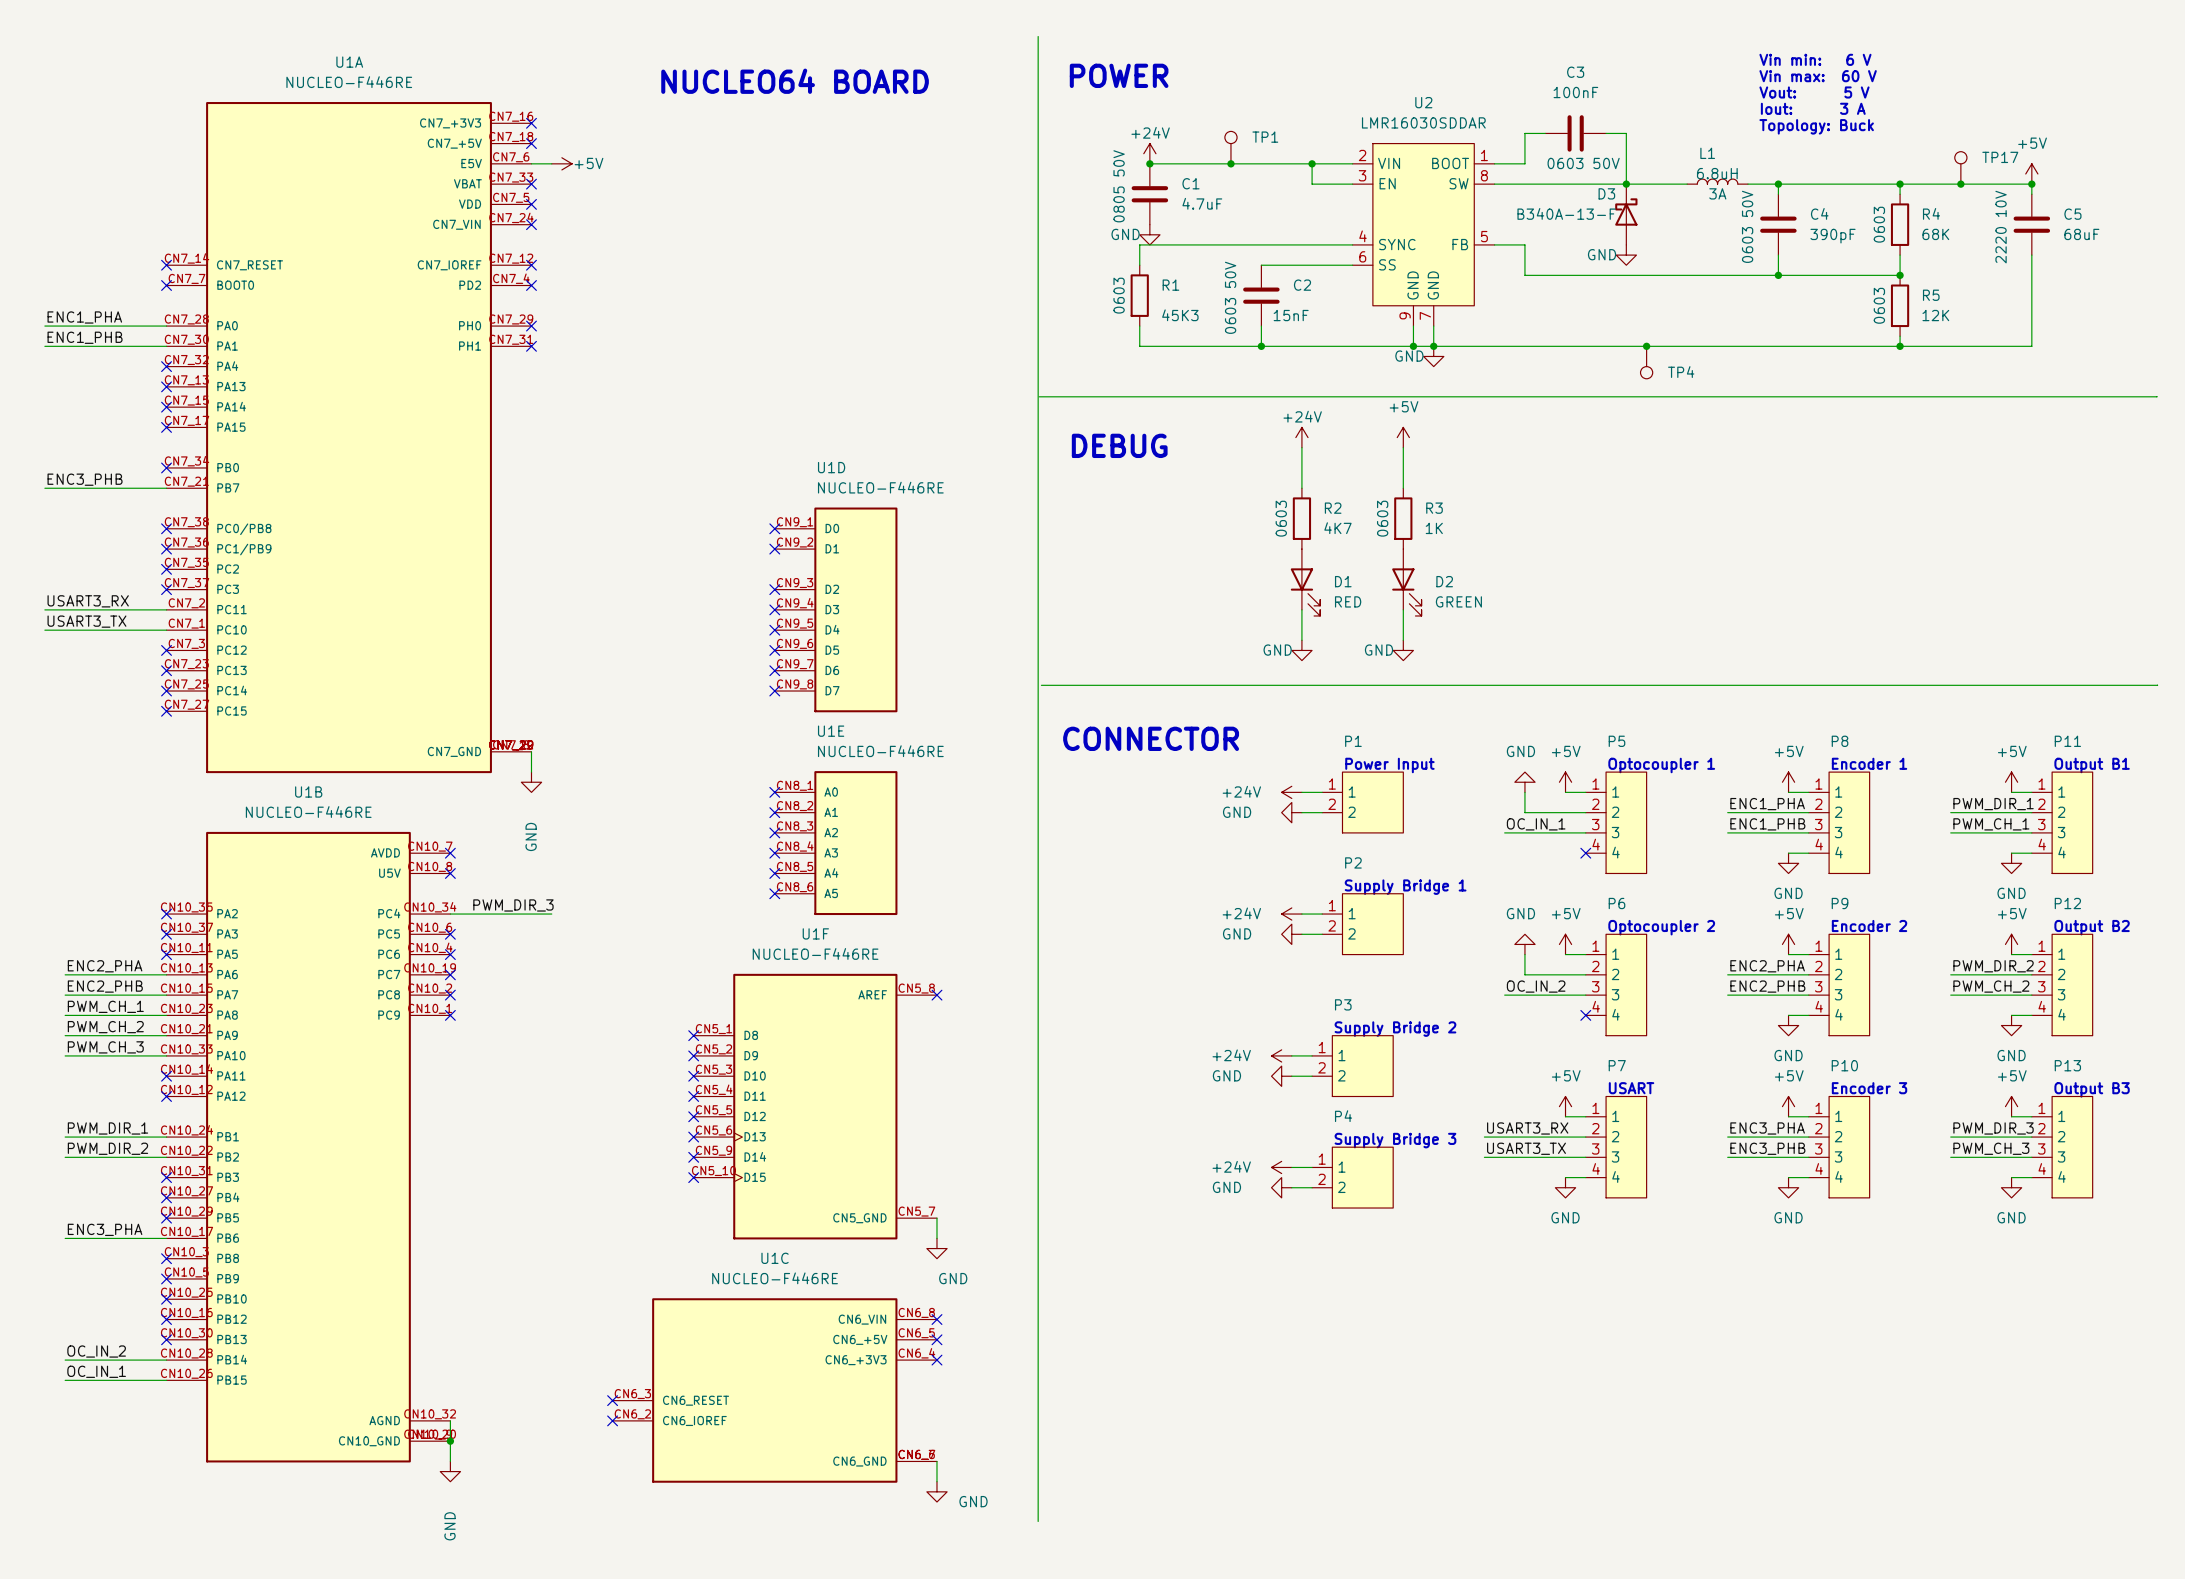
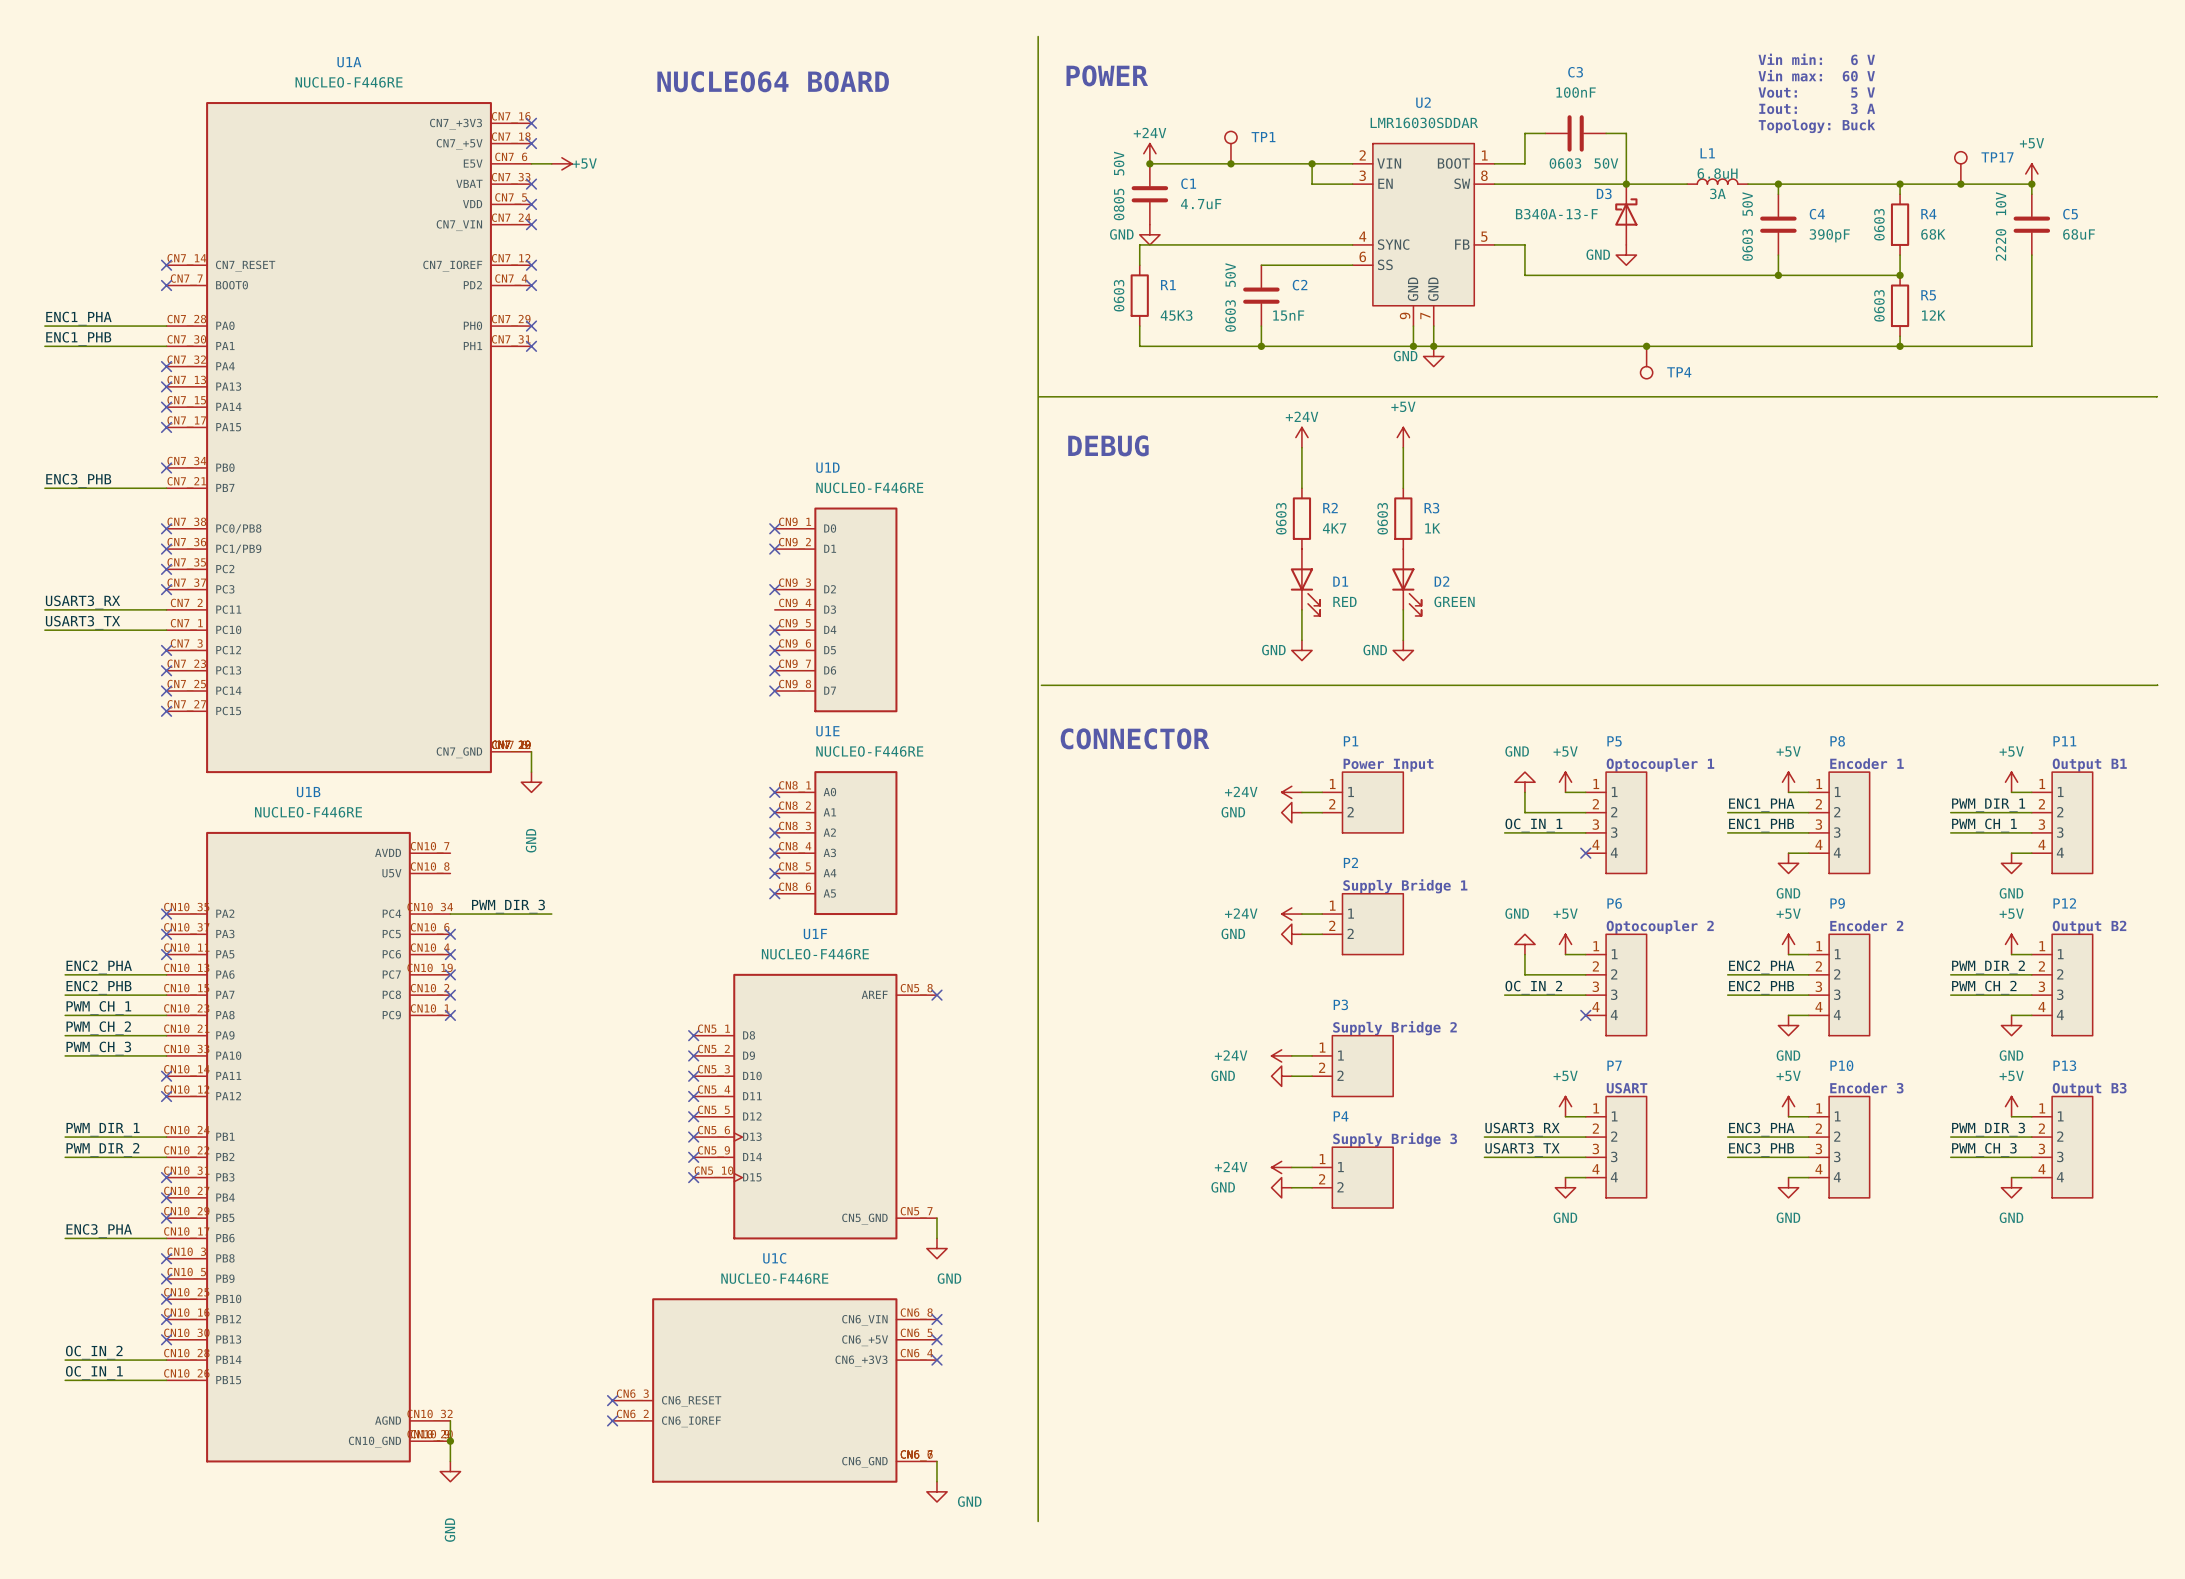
no-connect mark: (774, 609) -> none
no-connect mark: (450, 853) -> none
no-connect mark: (450, 873) -> none

